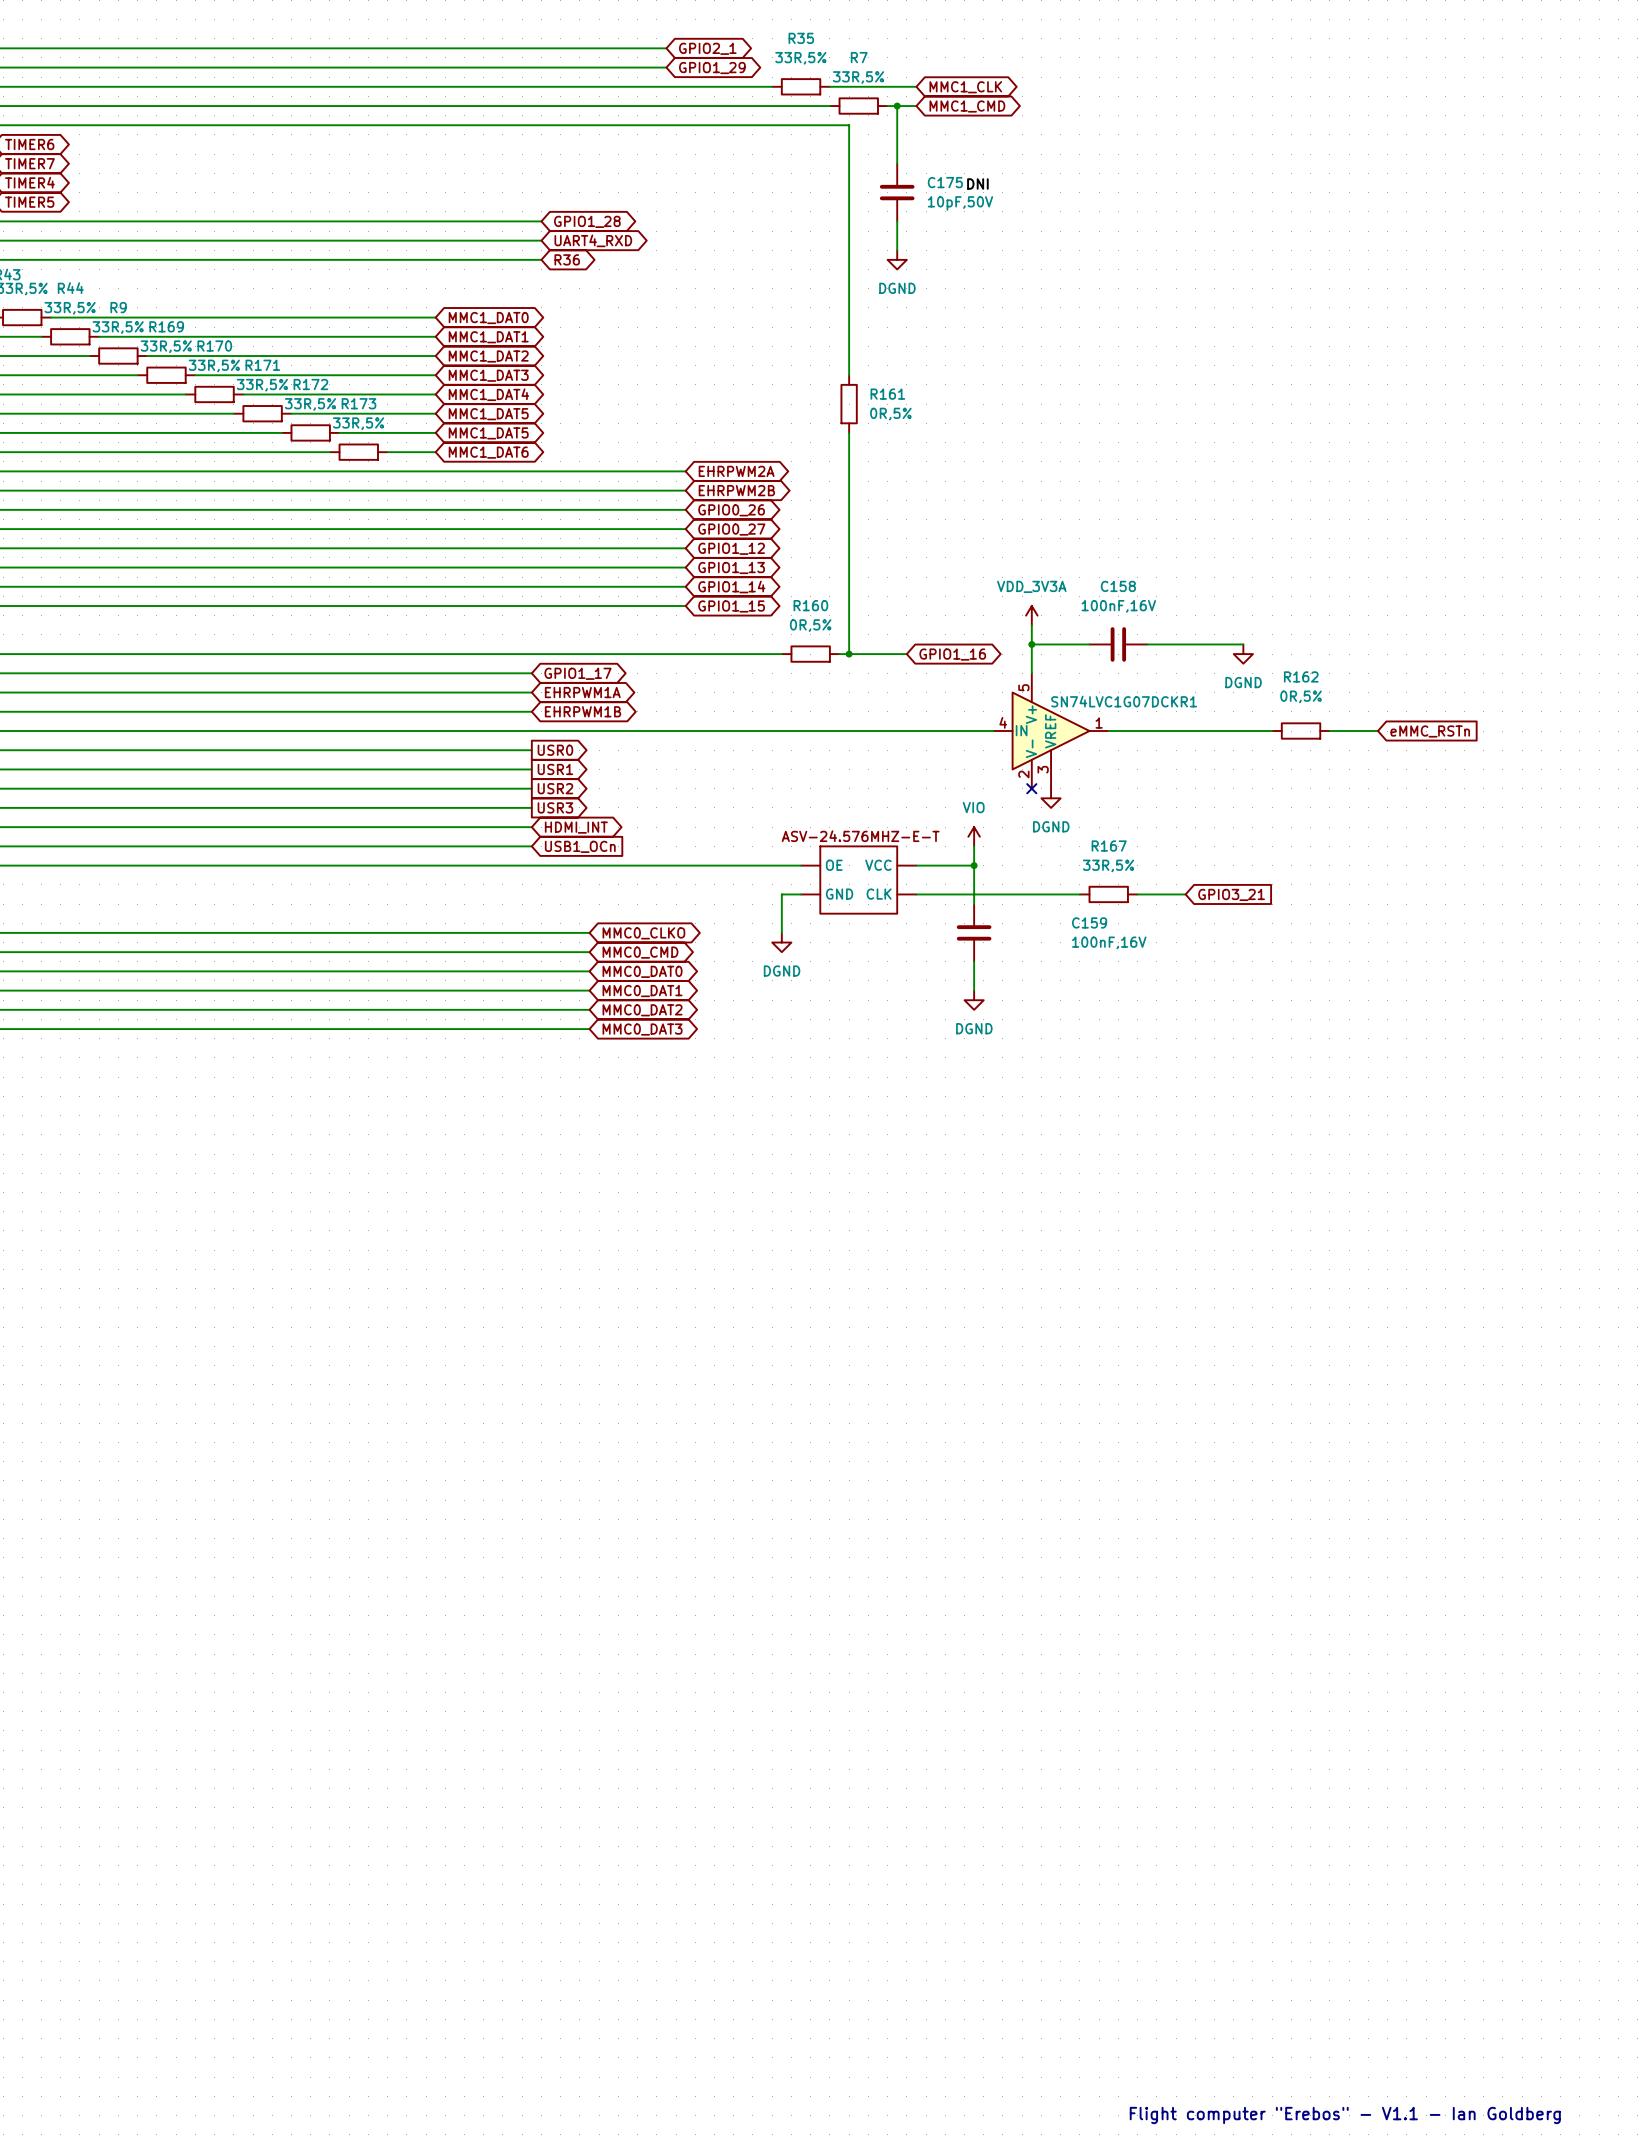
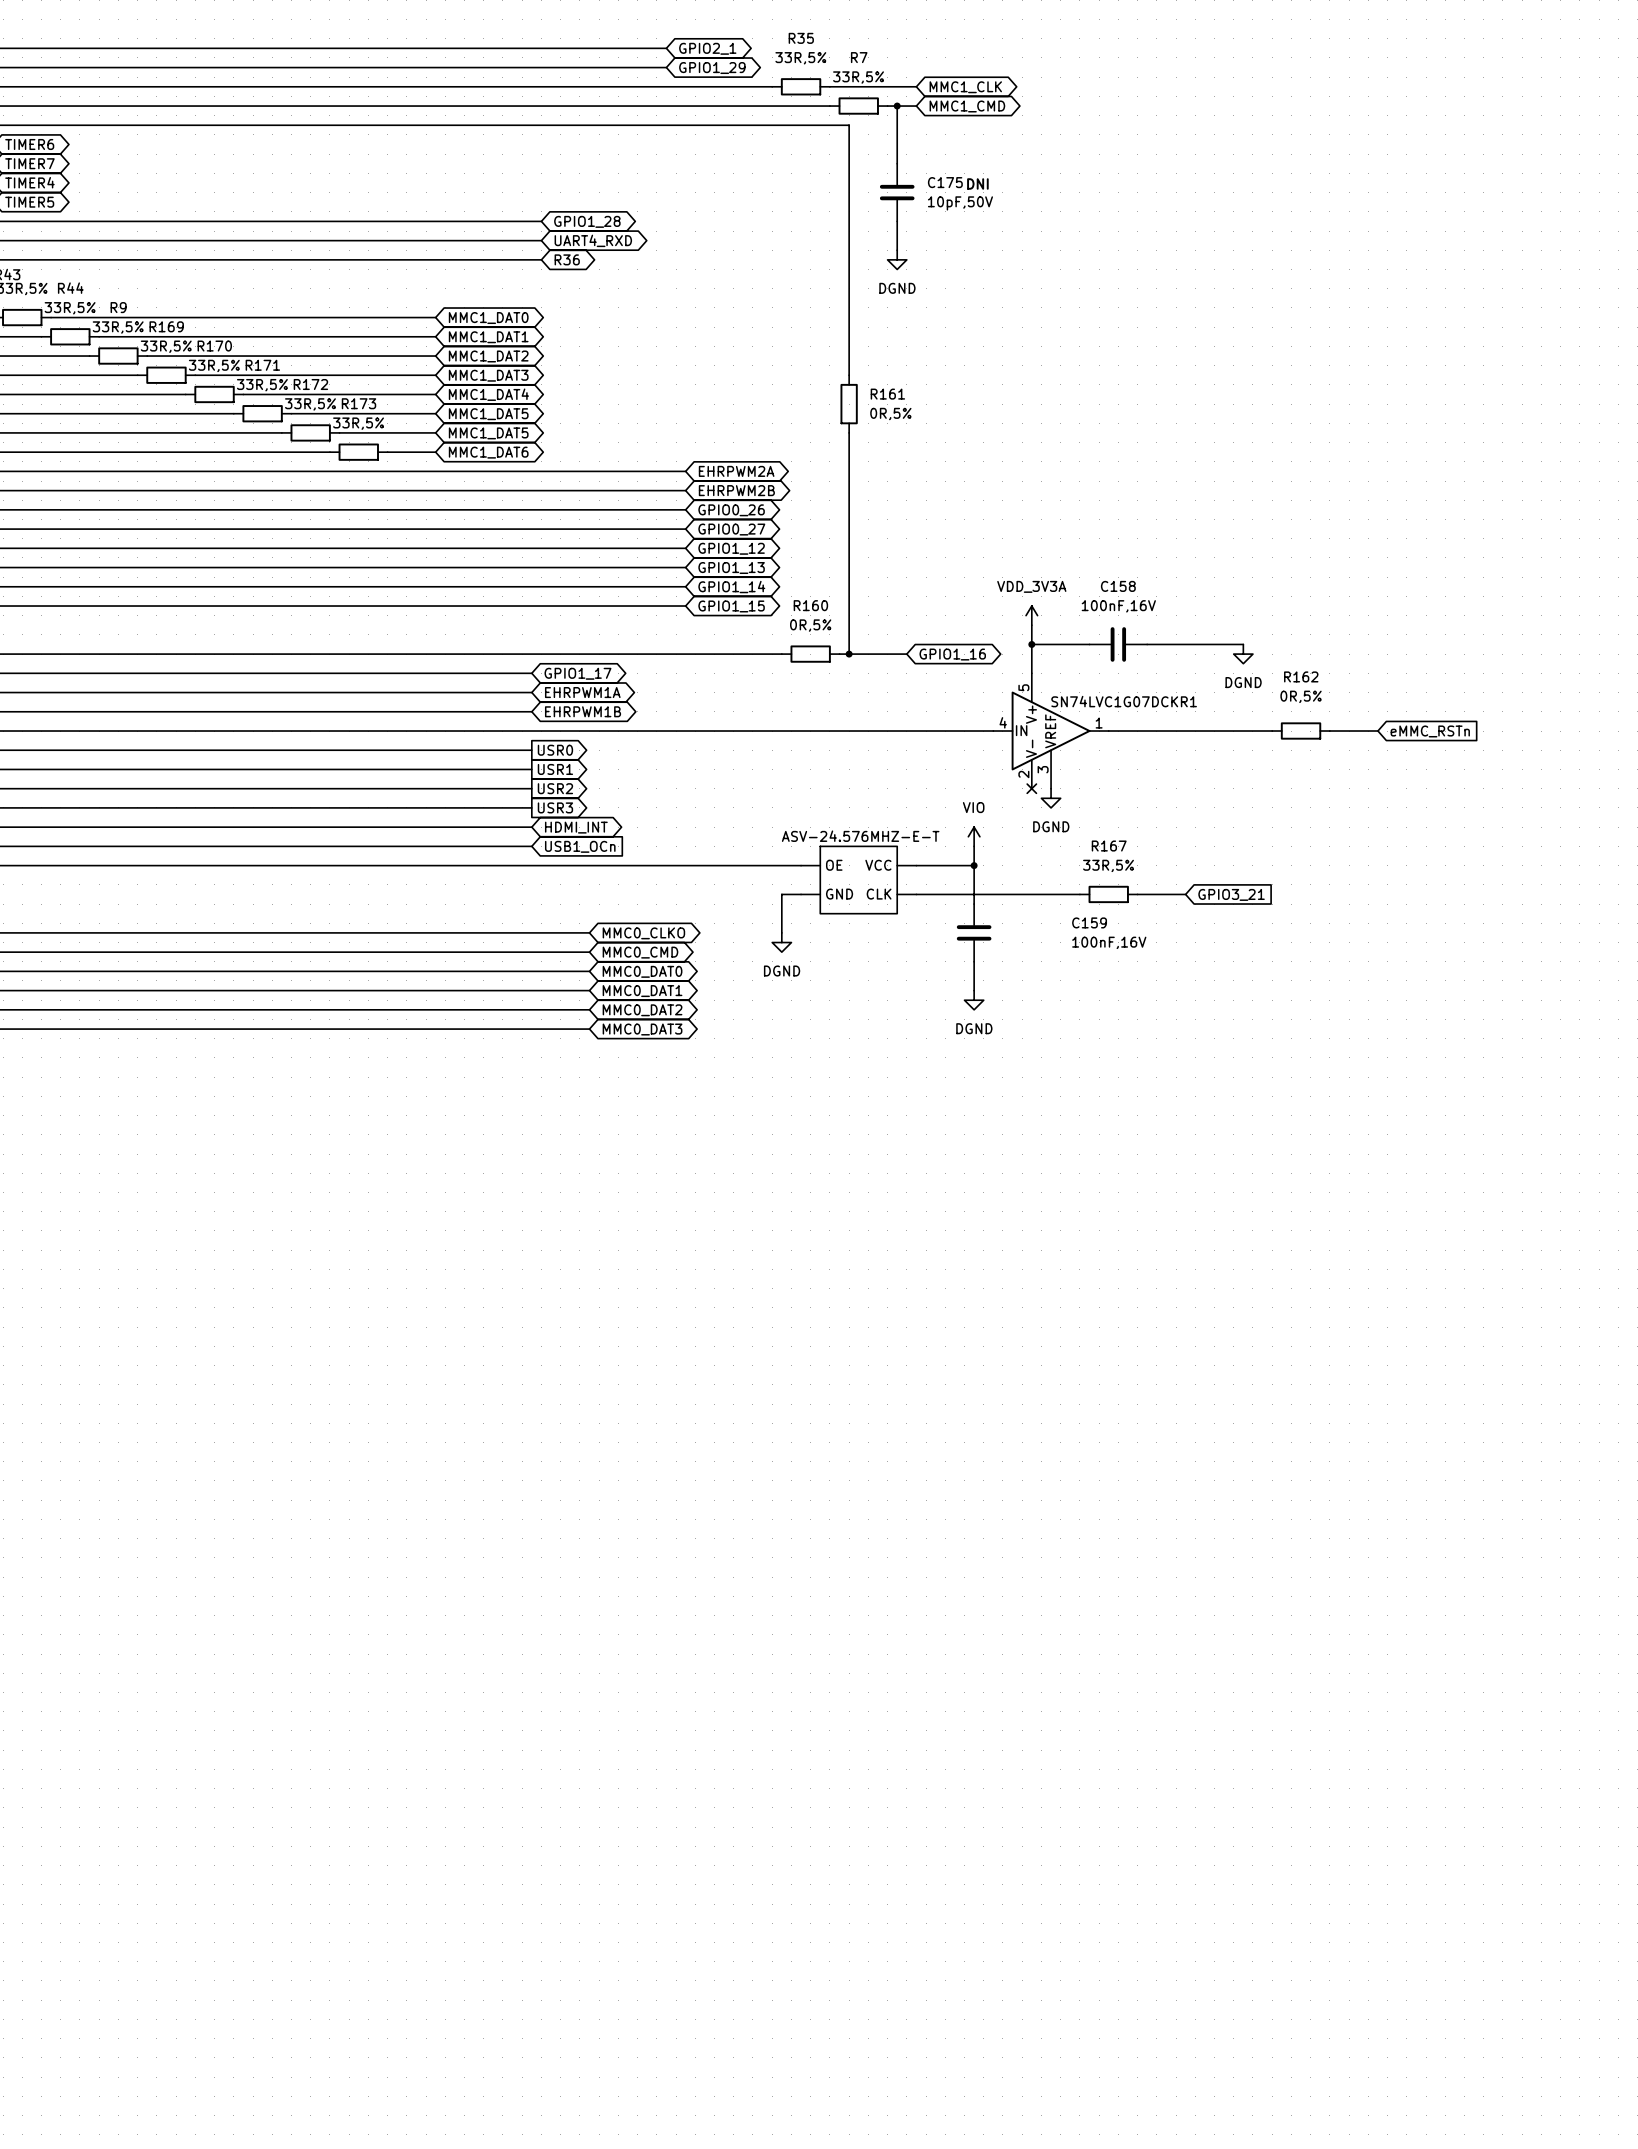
text: Flight computer "Erebos" - V1.1 - Ian Goldberg (1345, 2115) -> none

